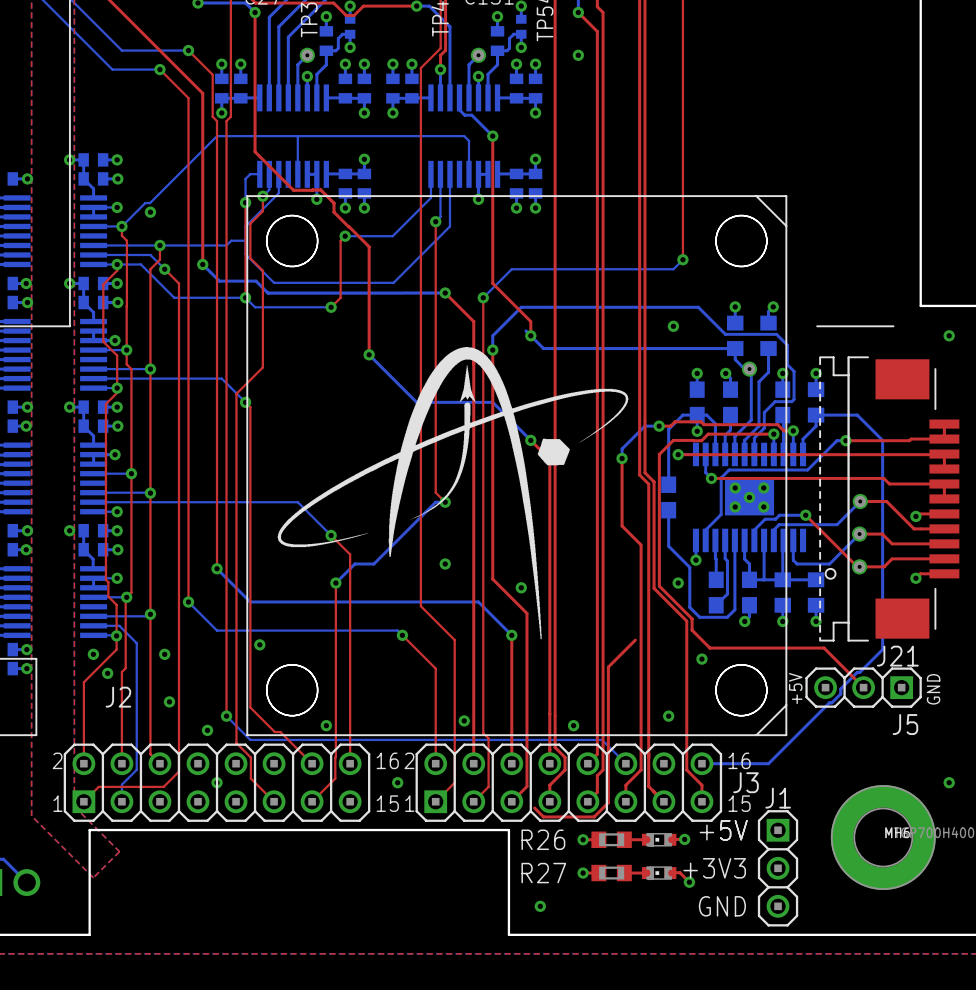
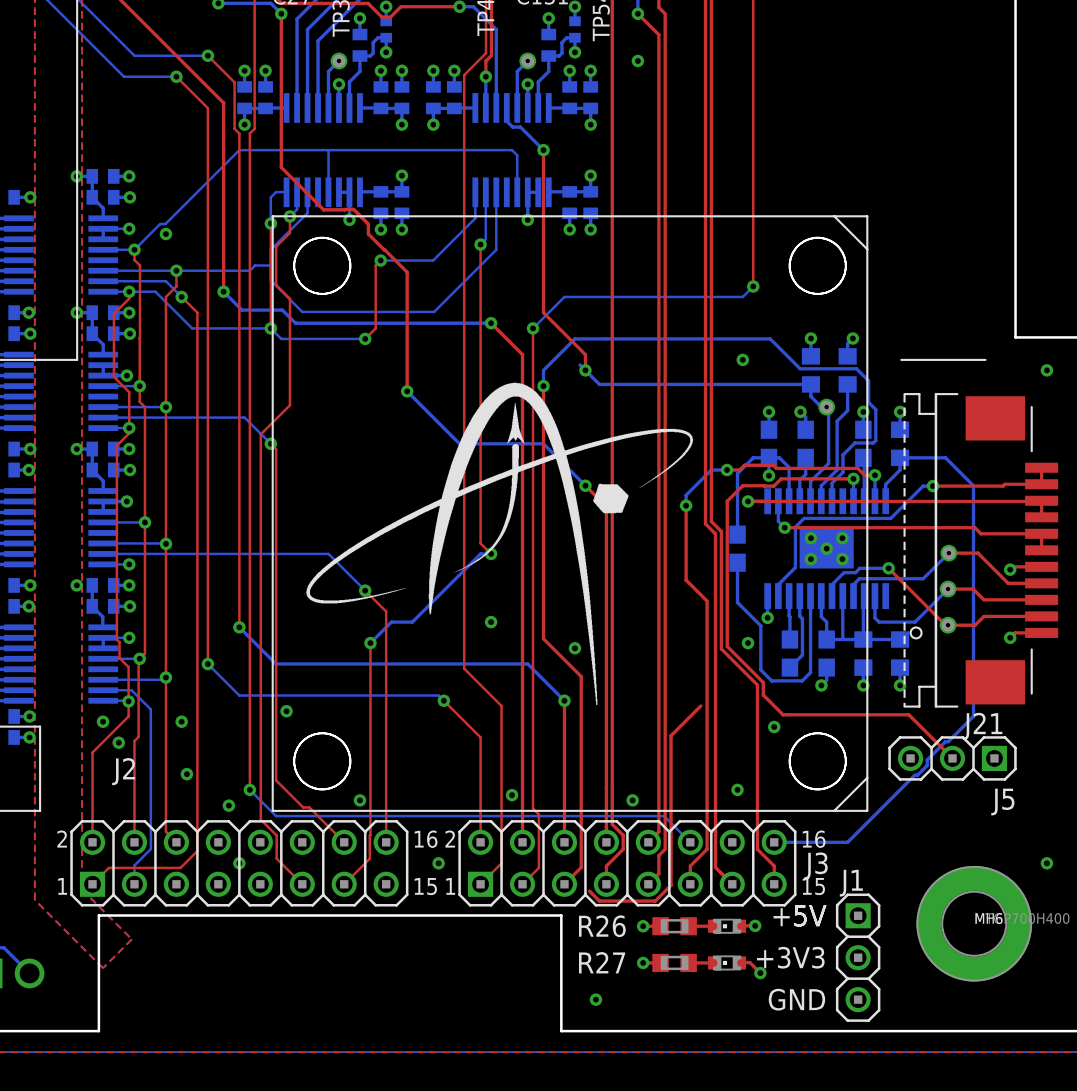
text: +5V (795, 688) -> none
text: GND (933, 689) -> none

